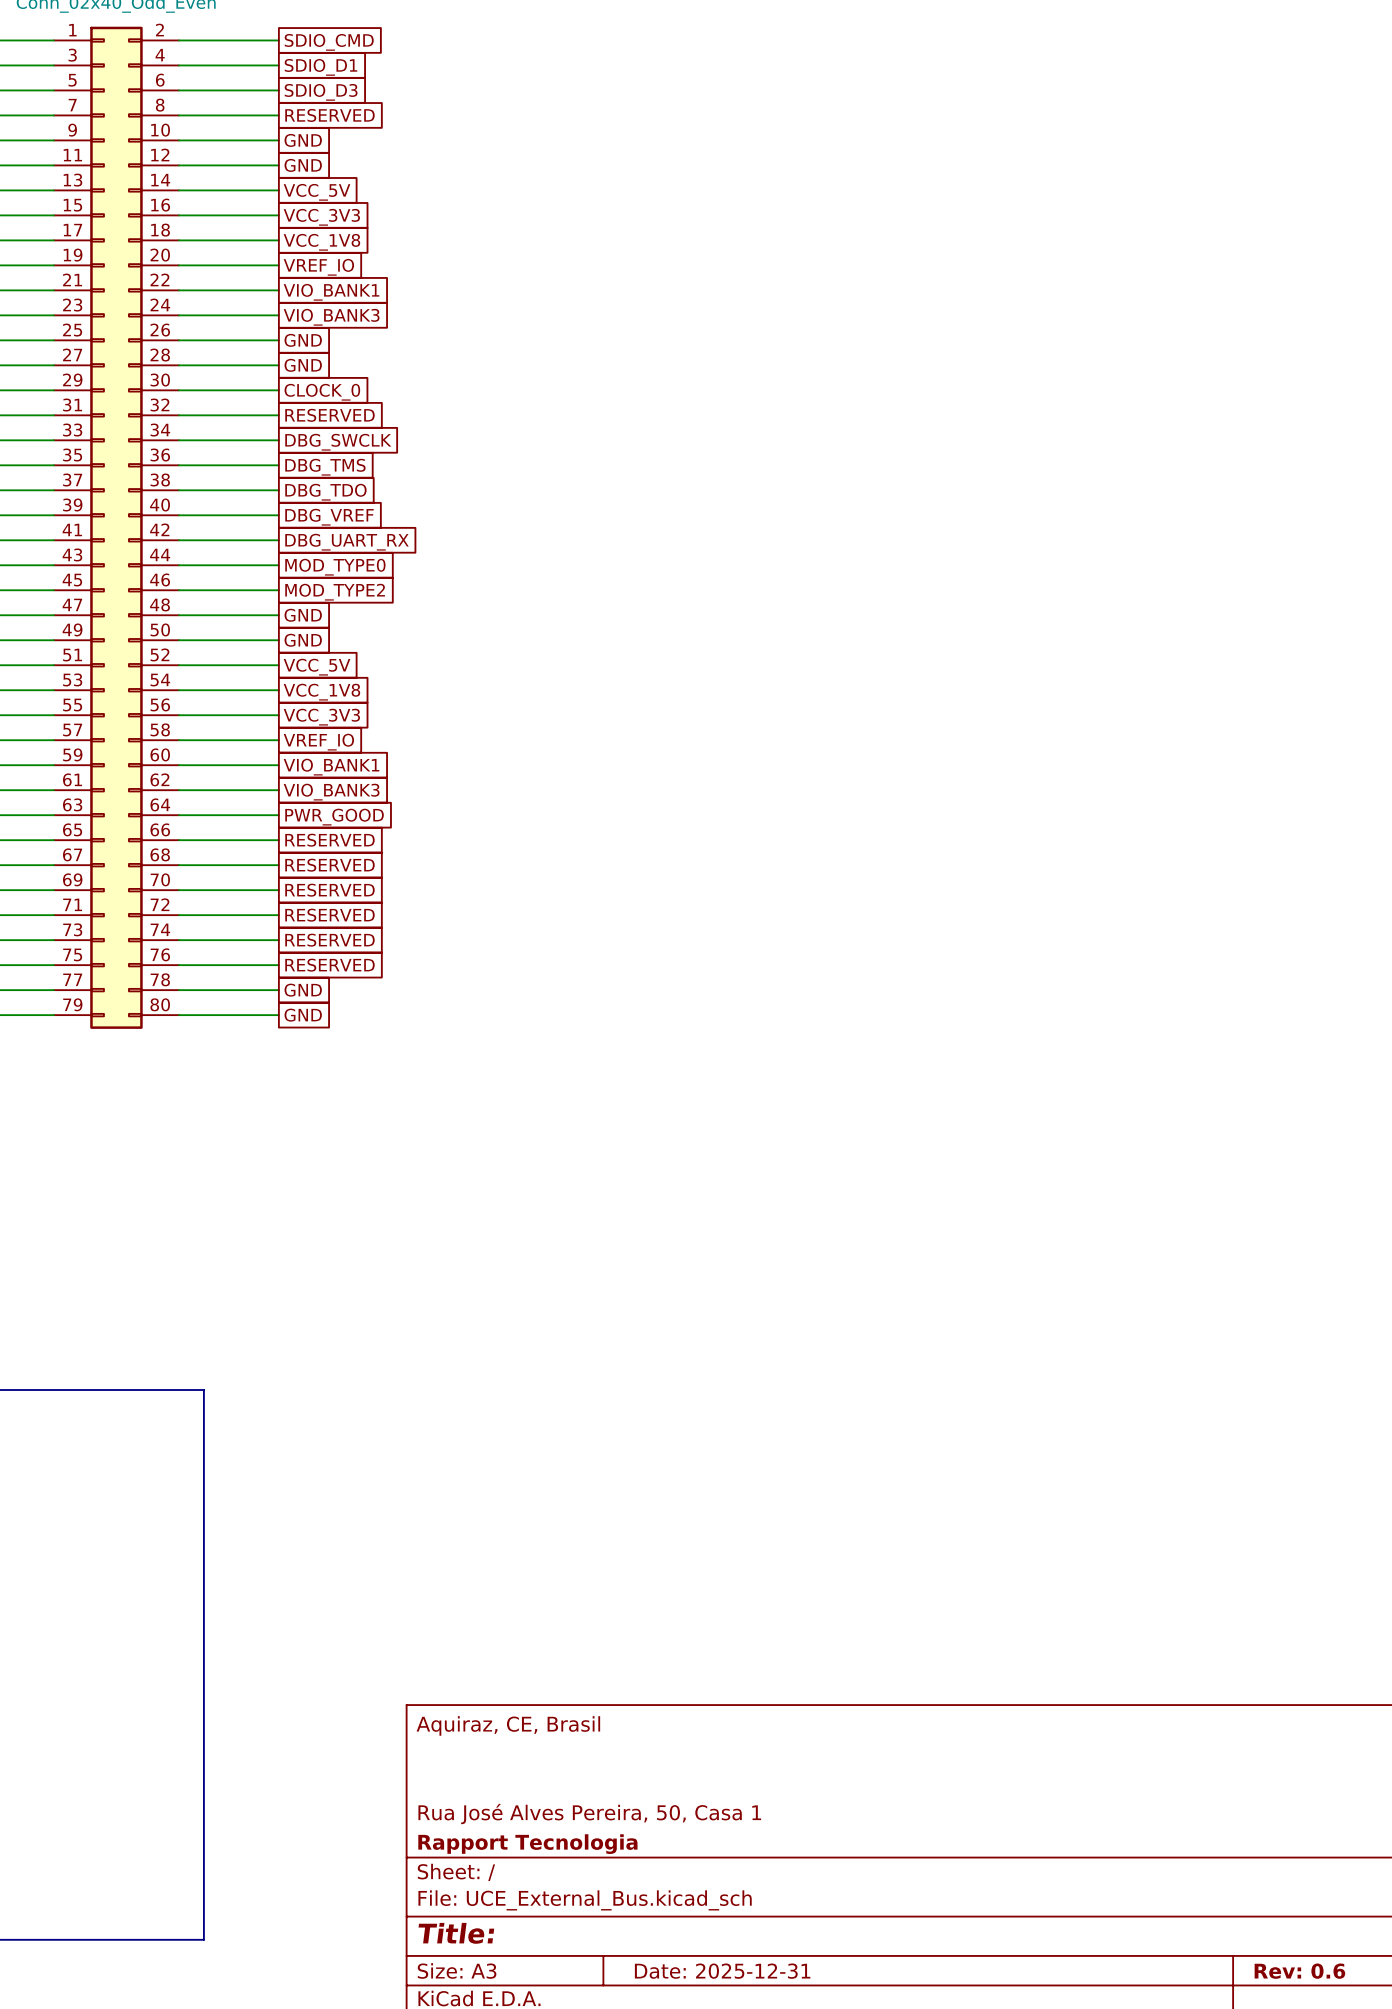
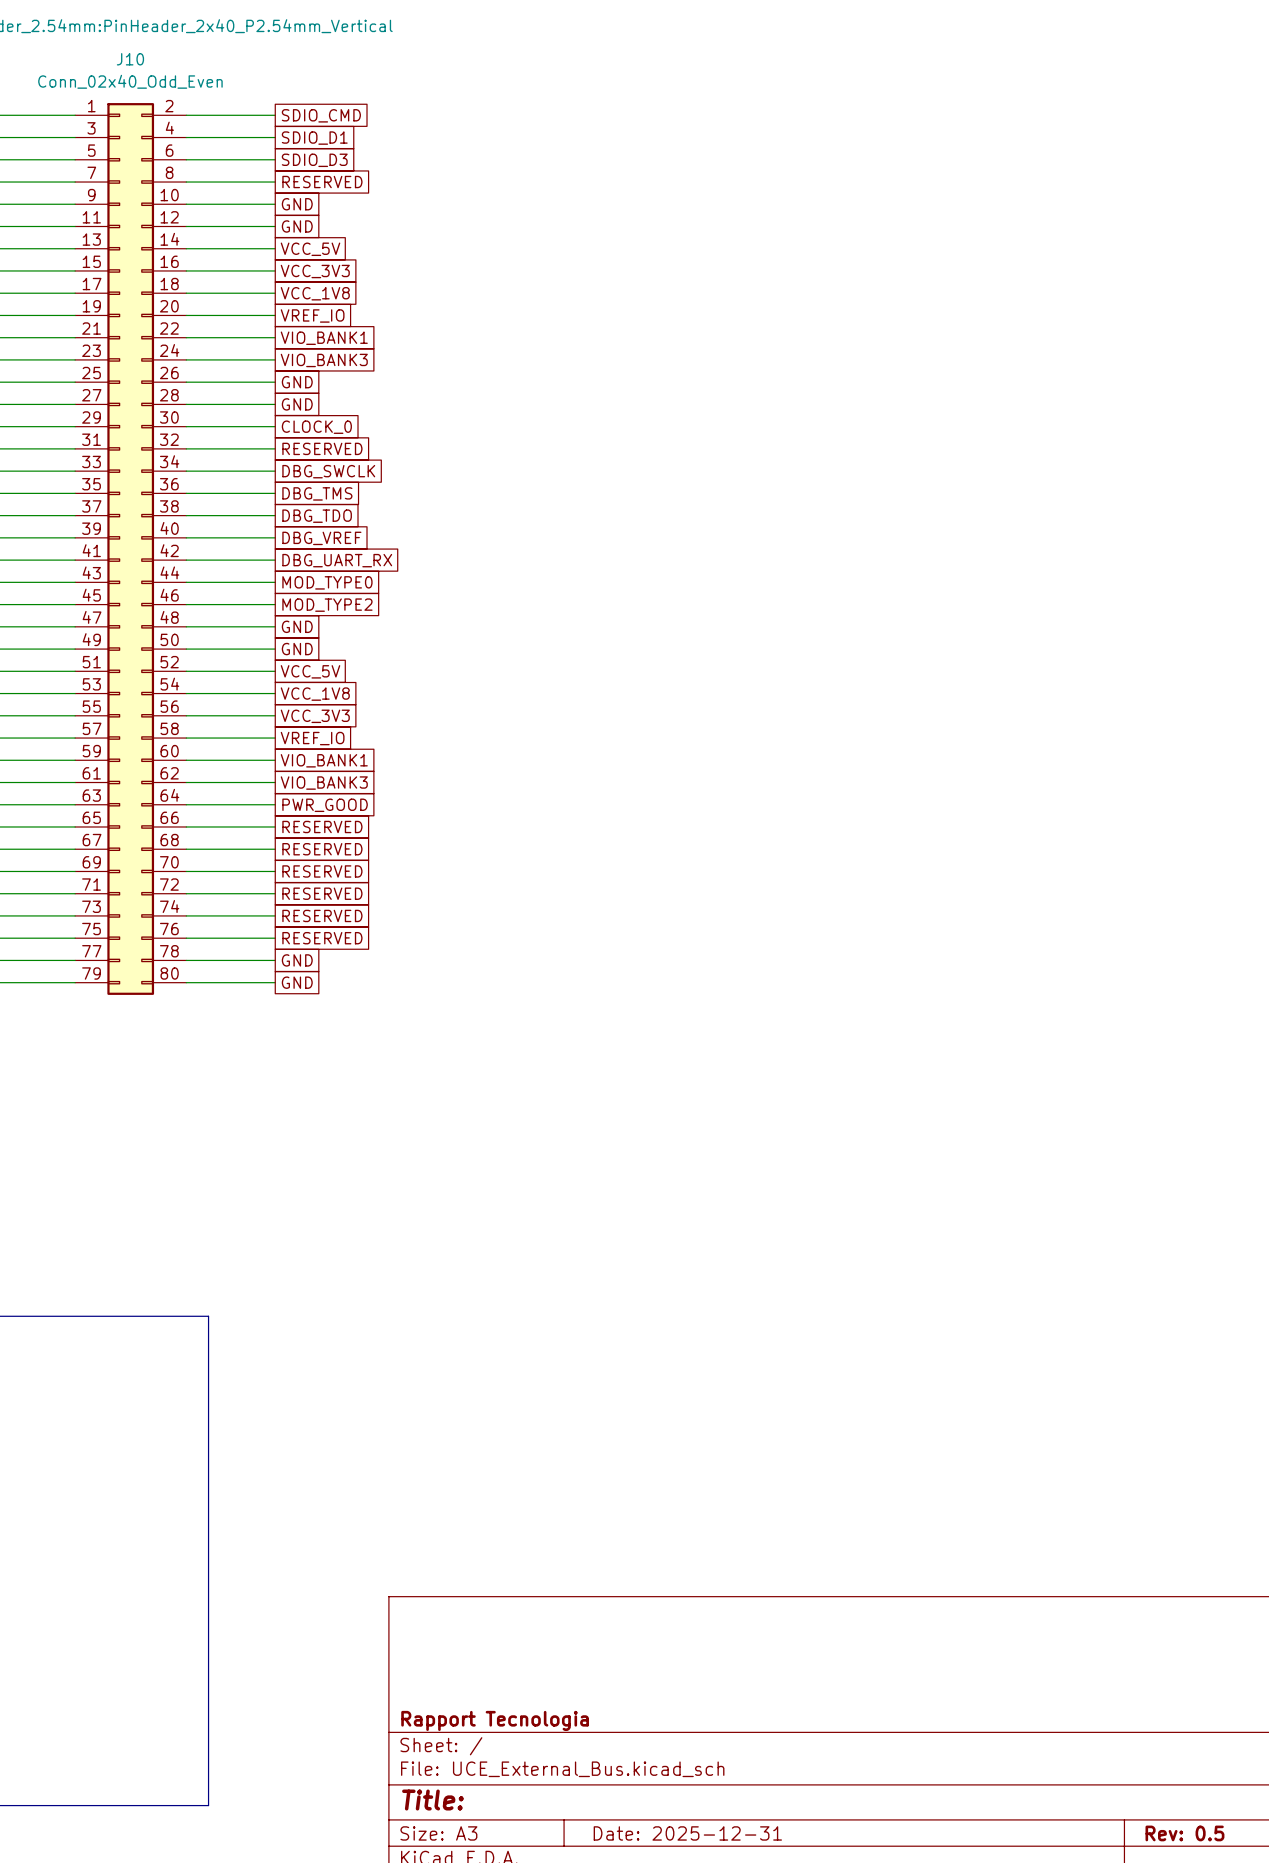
title block: Aquiraz, CE, Brasil (508, 1725) -> none
title block: Rua José Alves Pereira, 50, Casa 1 (589, 1814) -> none
title block: Rev: 0.6 (1299, 1971) -> Rev: 0.5 (1184, 1833)

